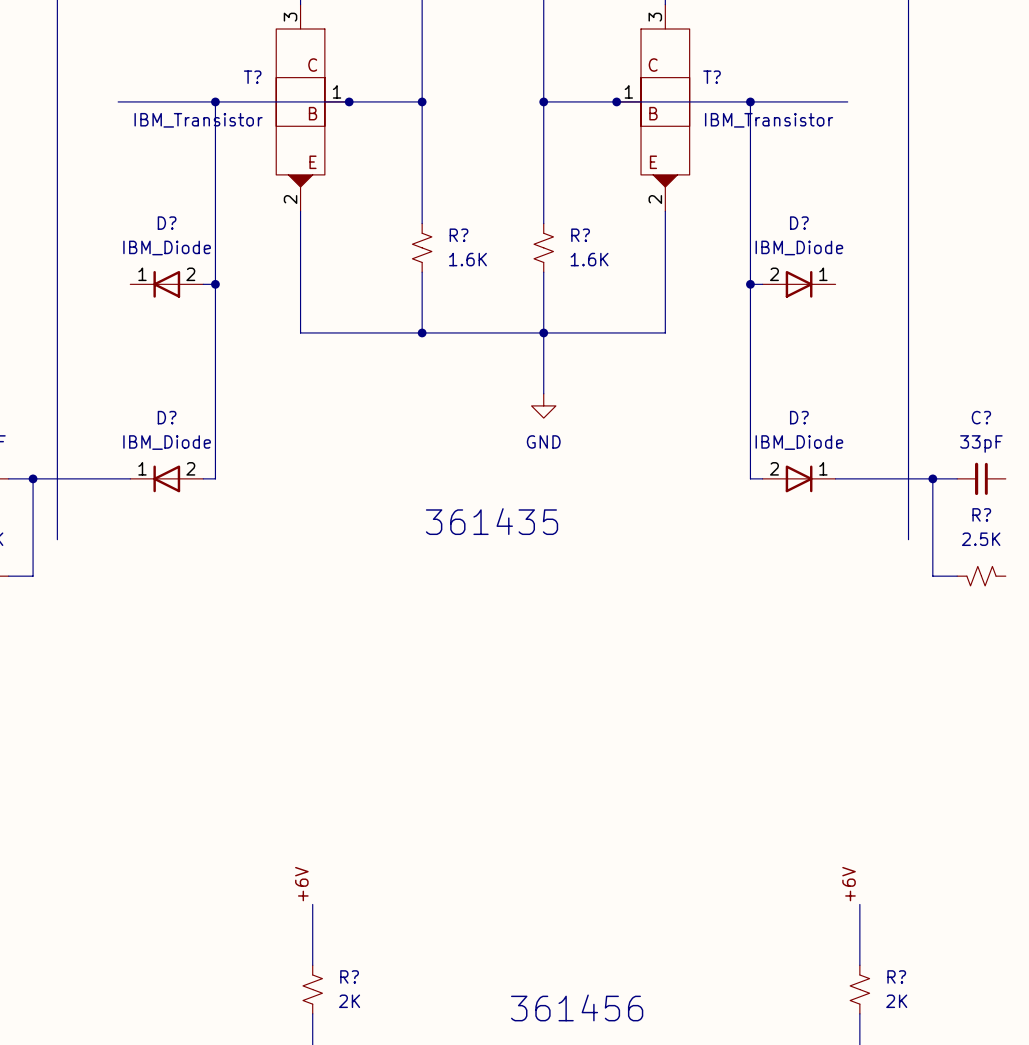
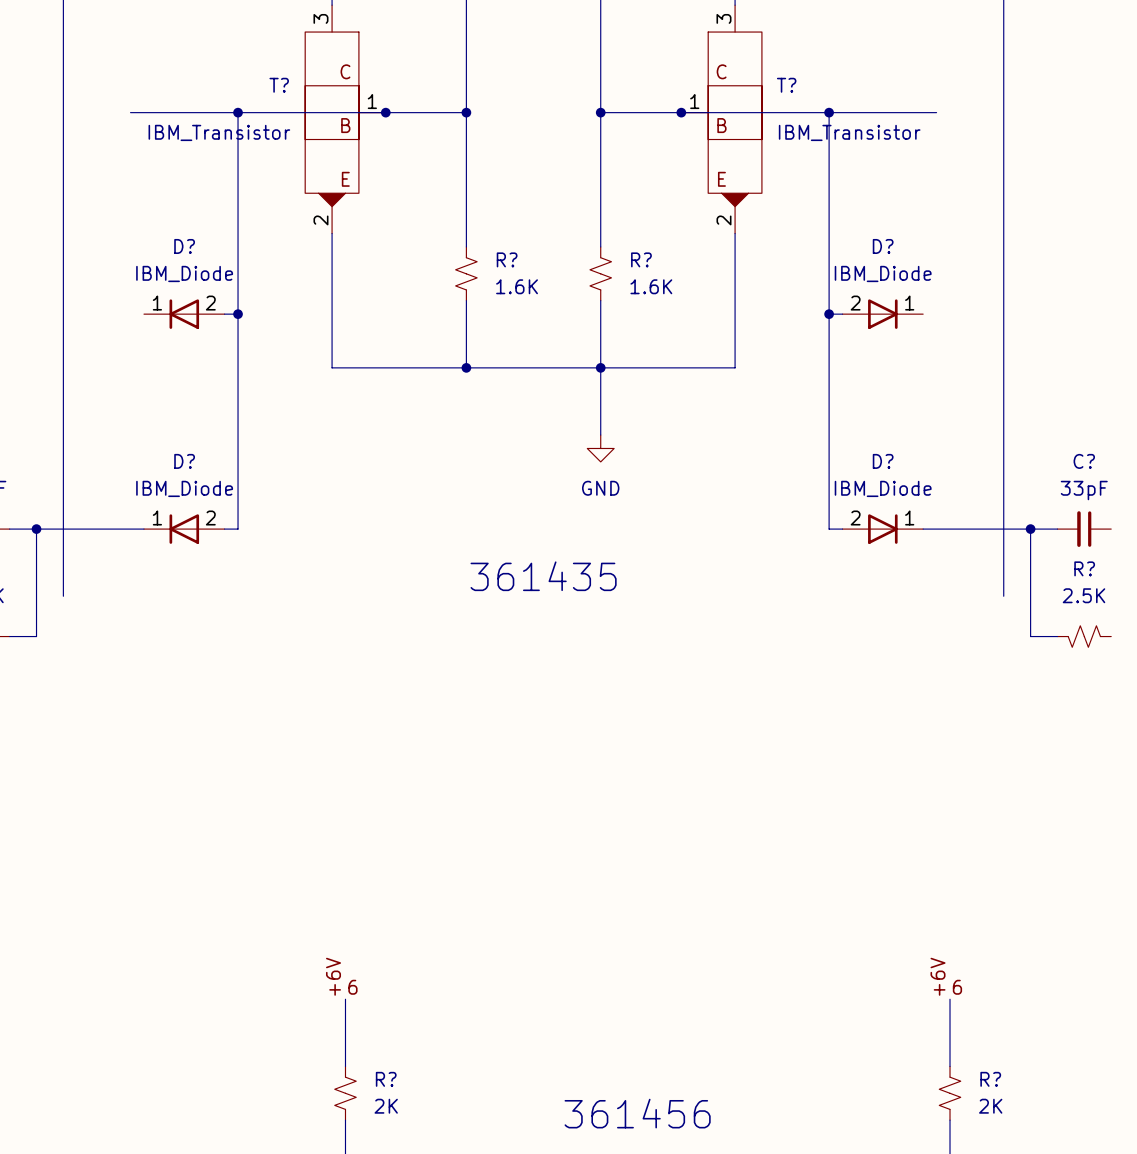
label: none -> 6 (352, 987)
label: none -> 6 (957, 987)

